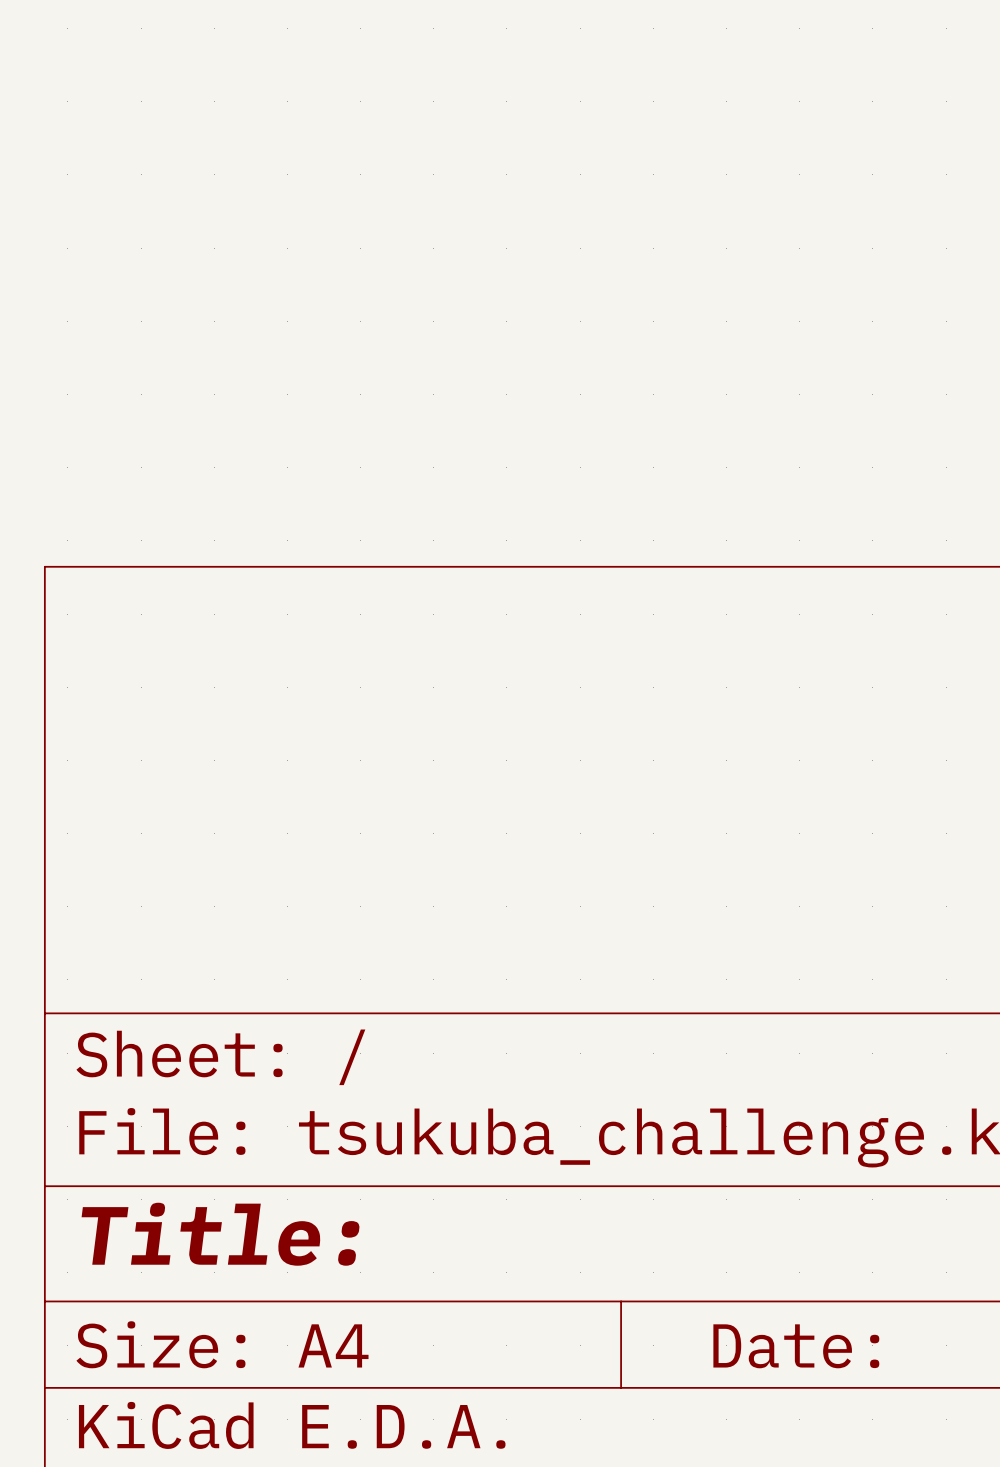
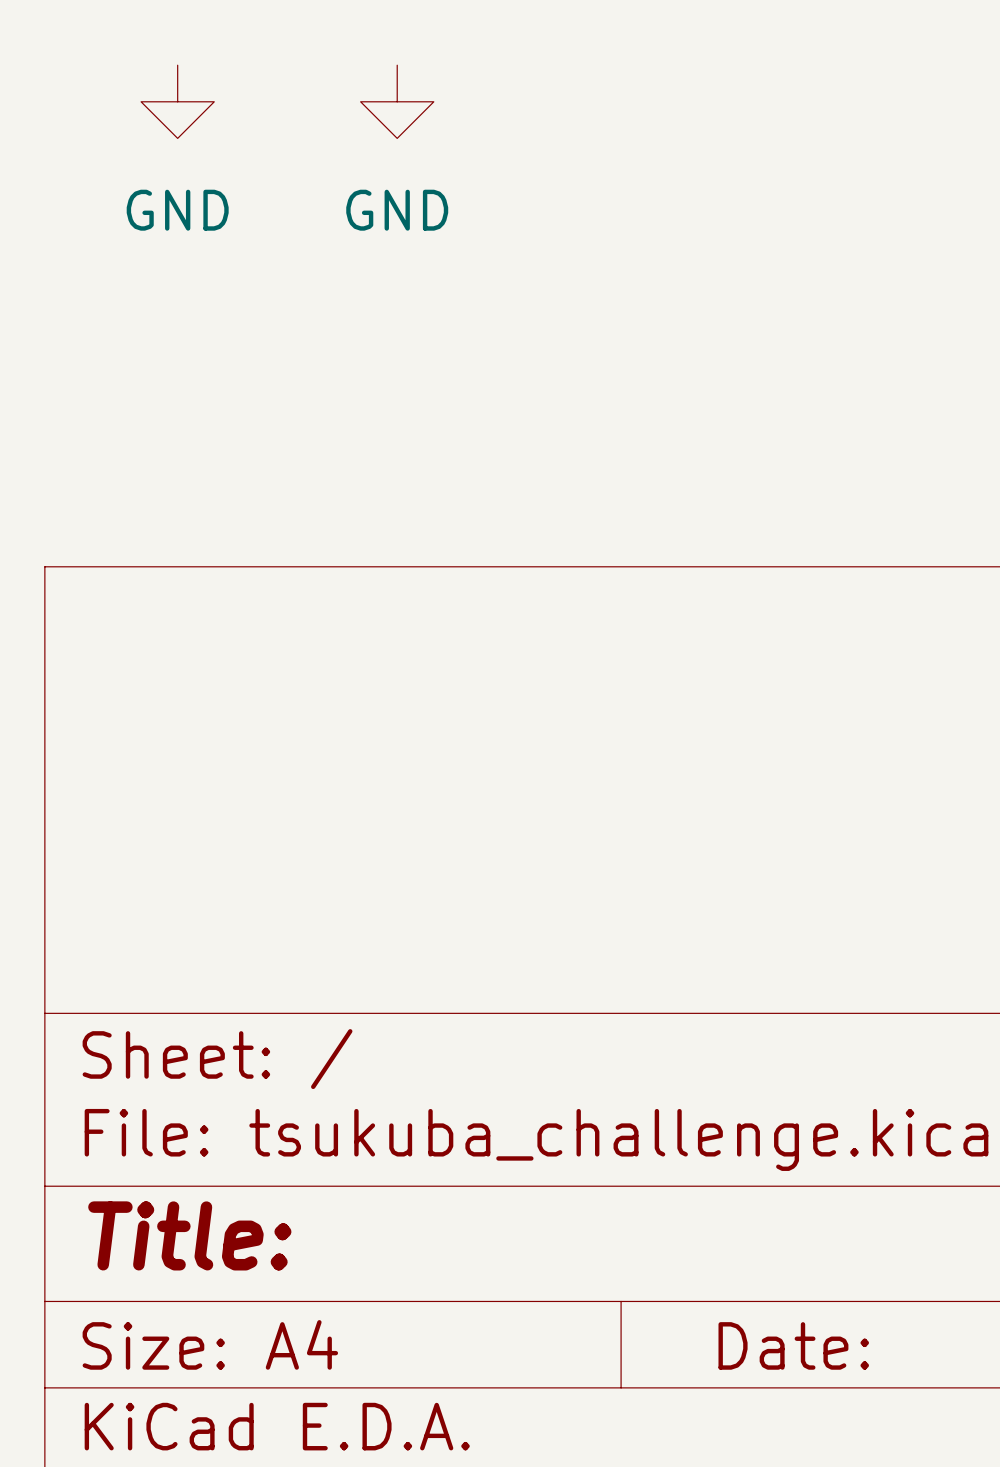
power symbol: none -> GND (177, 101)
power symbol: none -> GND (397, 101)

